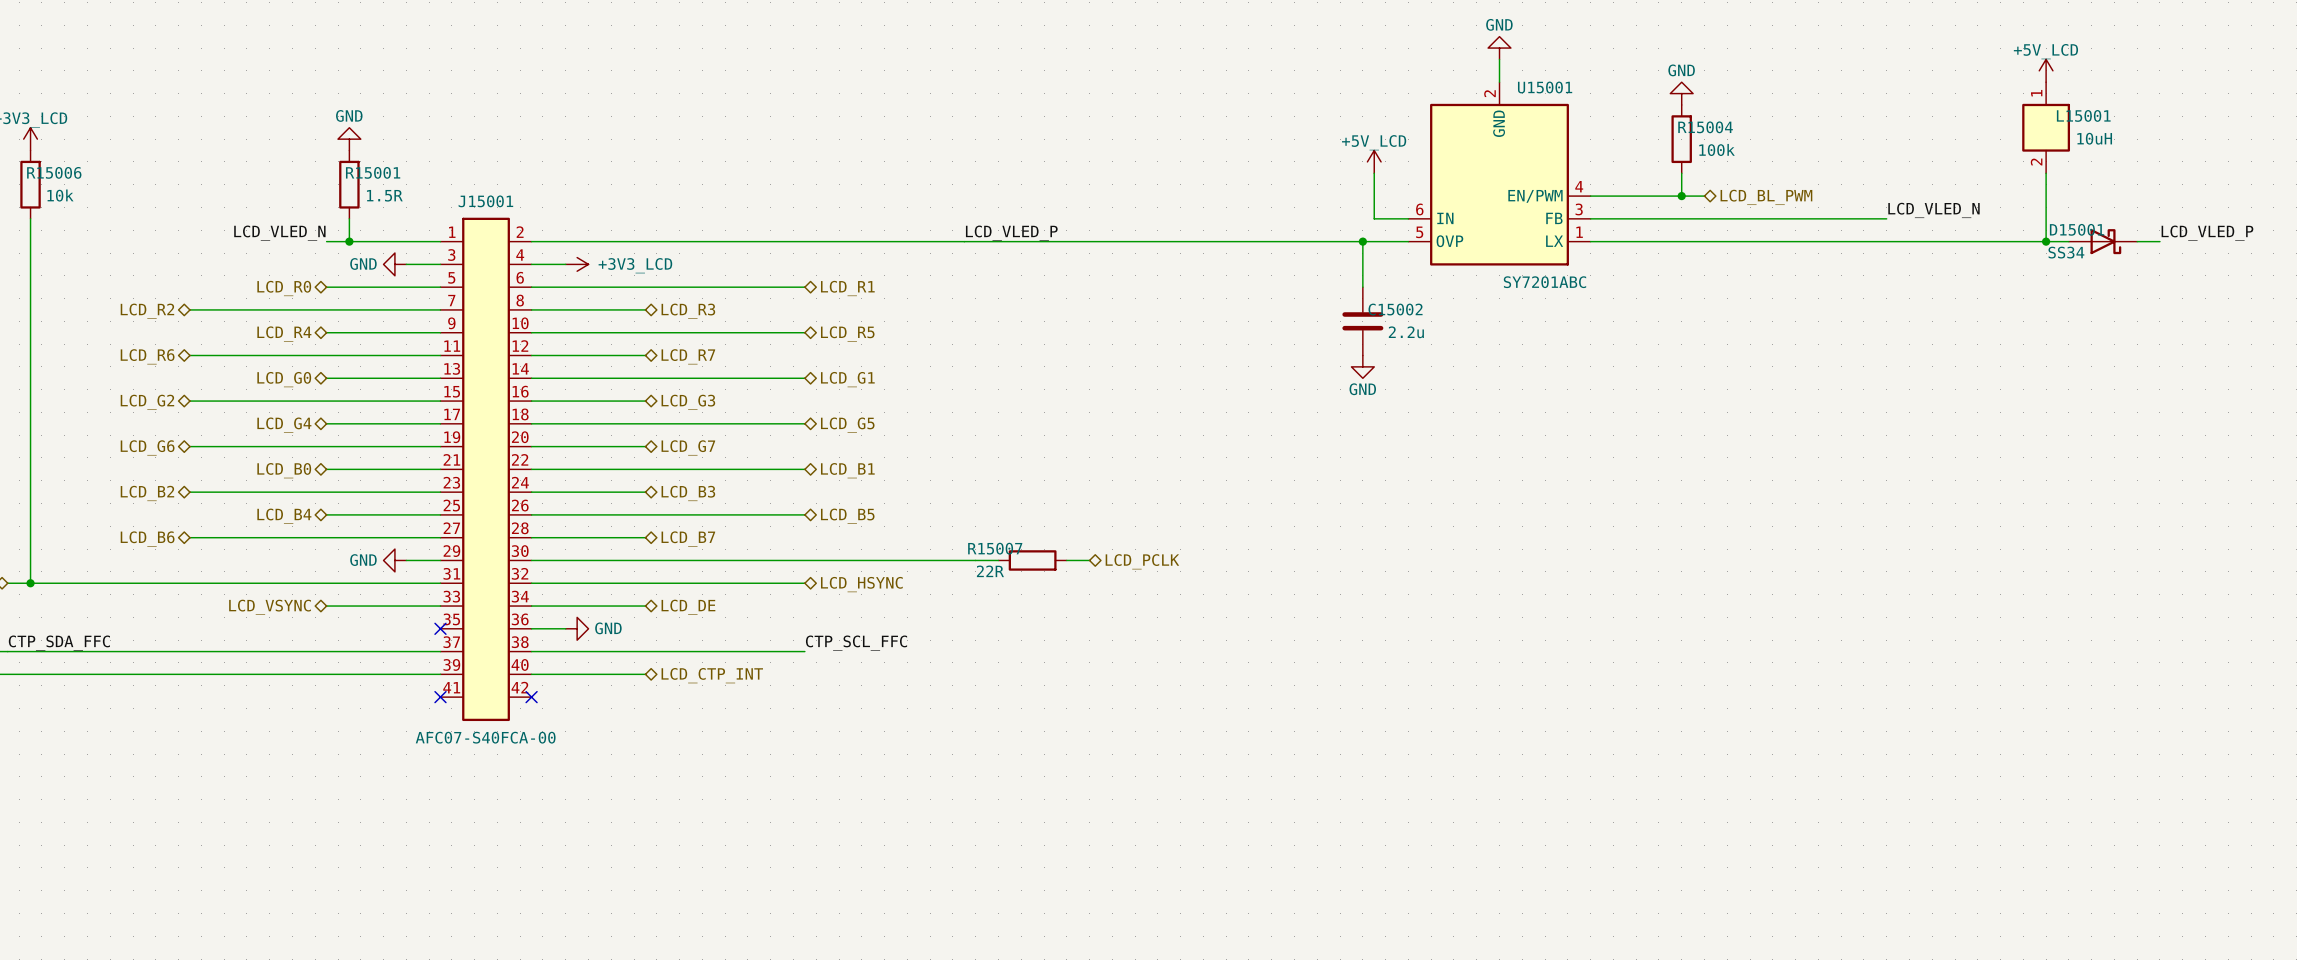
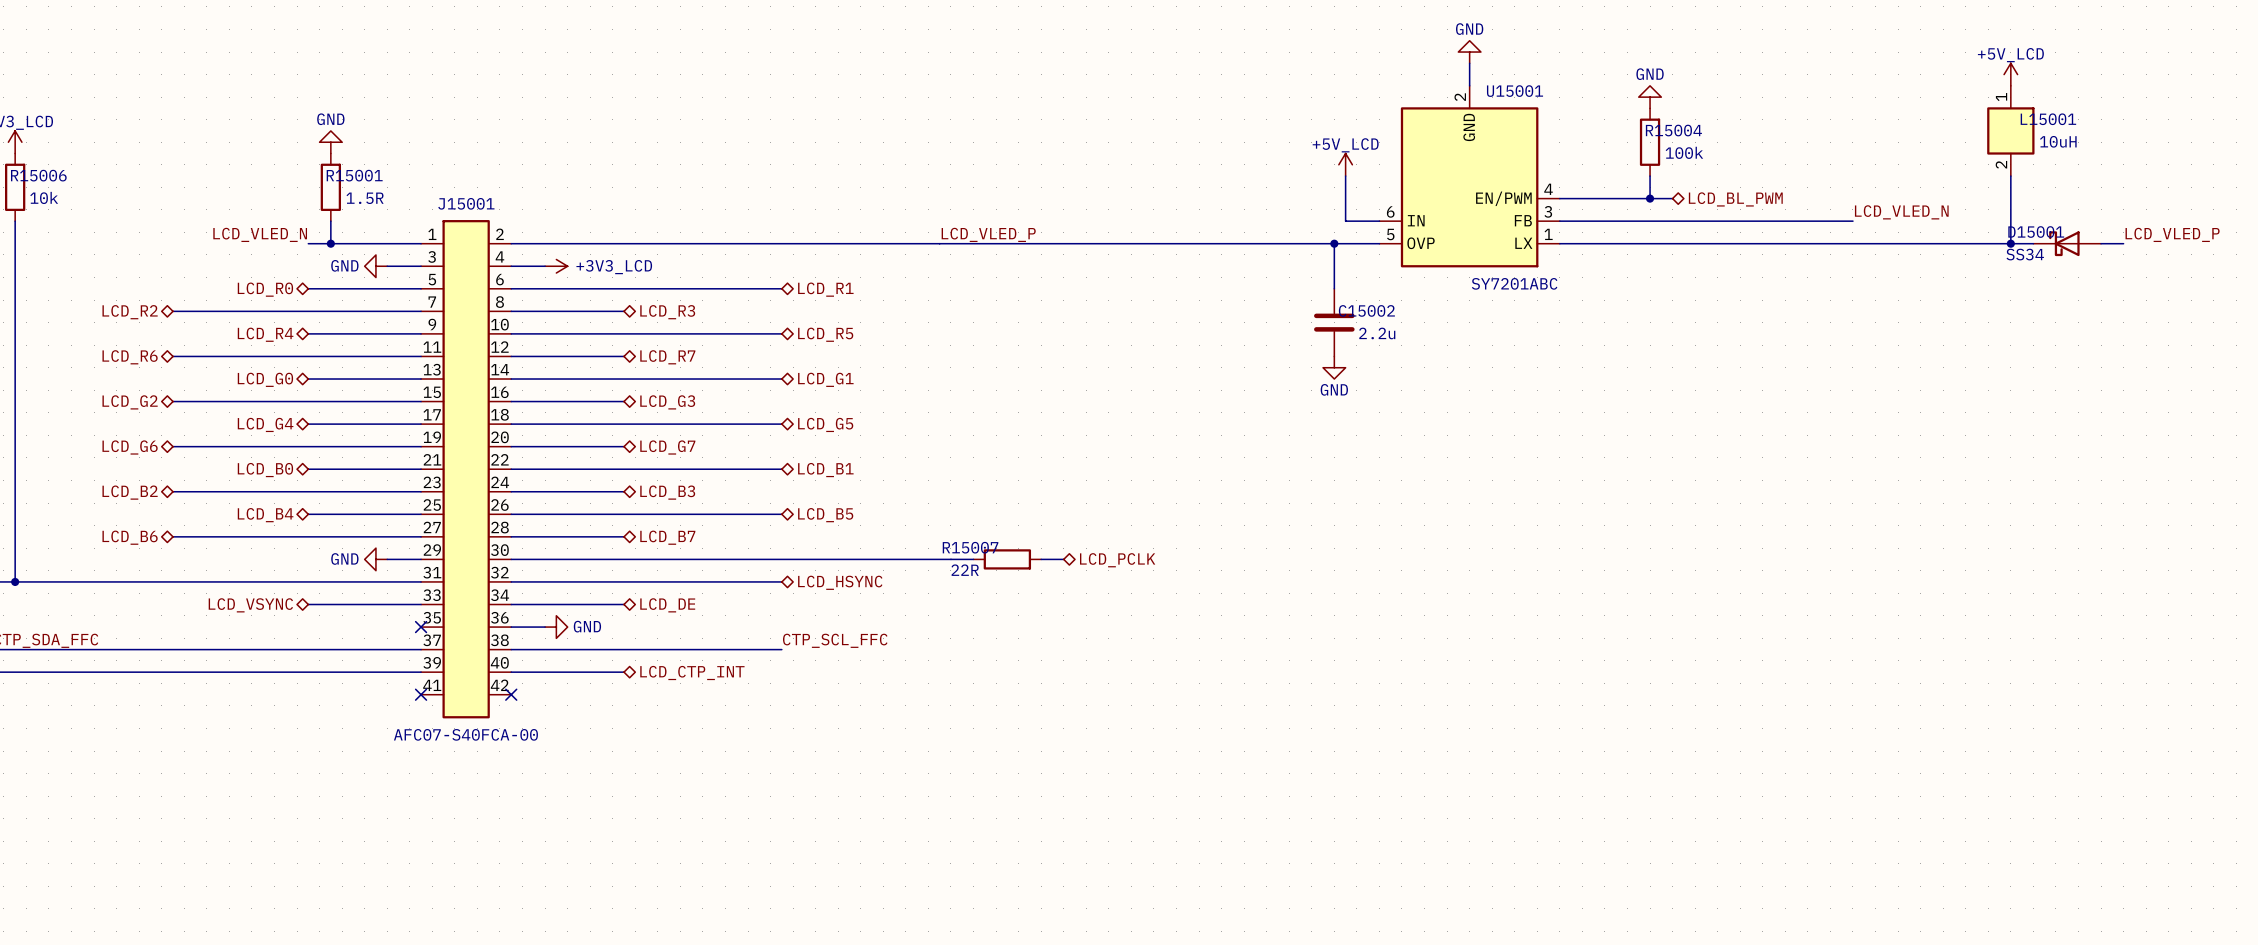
D15001 rotation: 0° (2105, 241) -> 180° (2064, 243)

